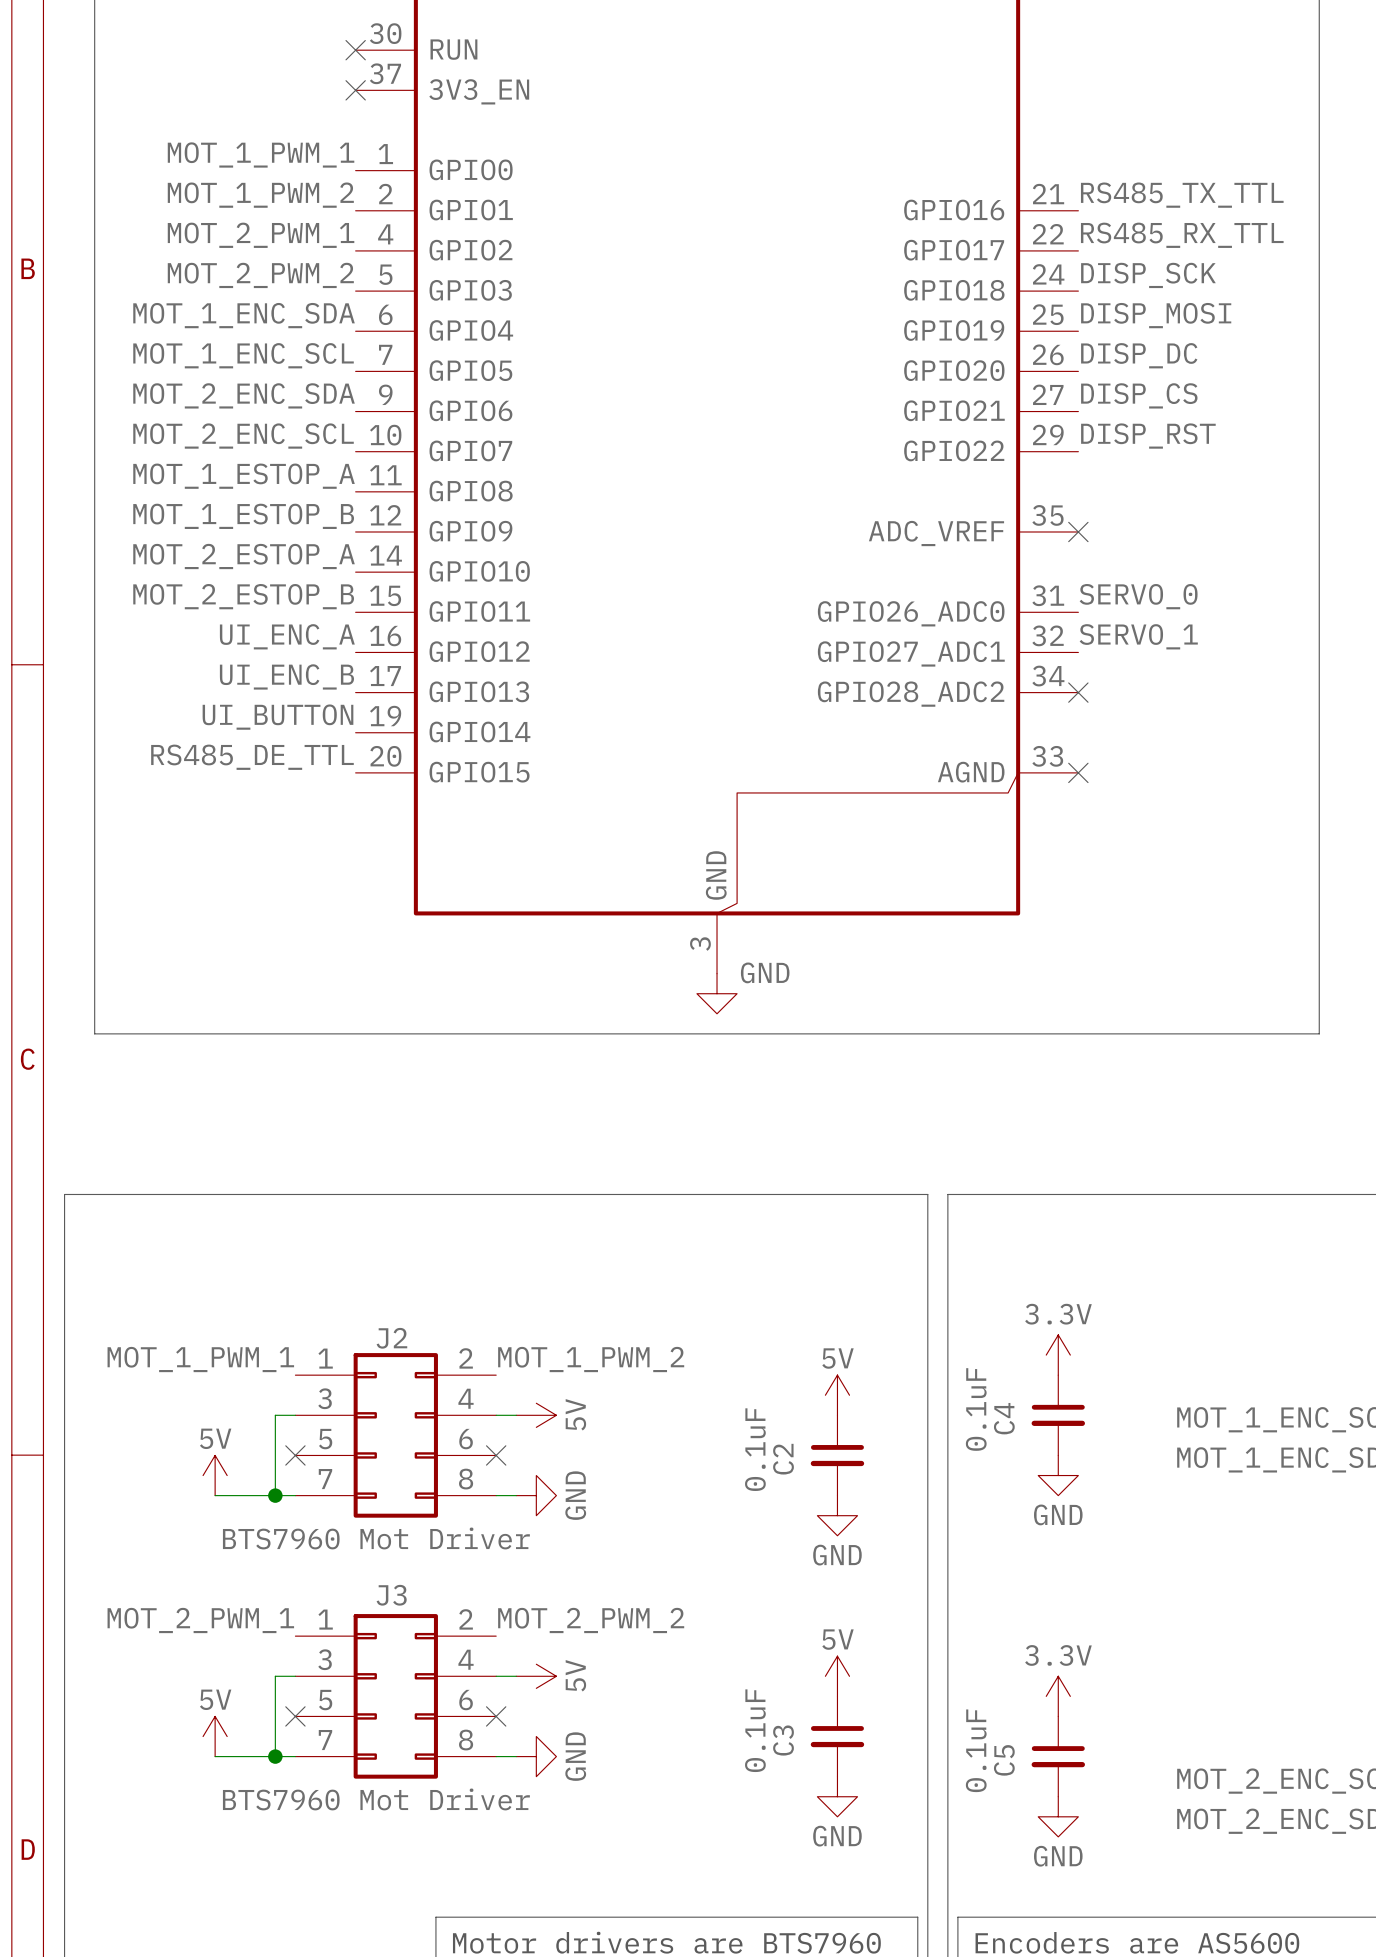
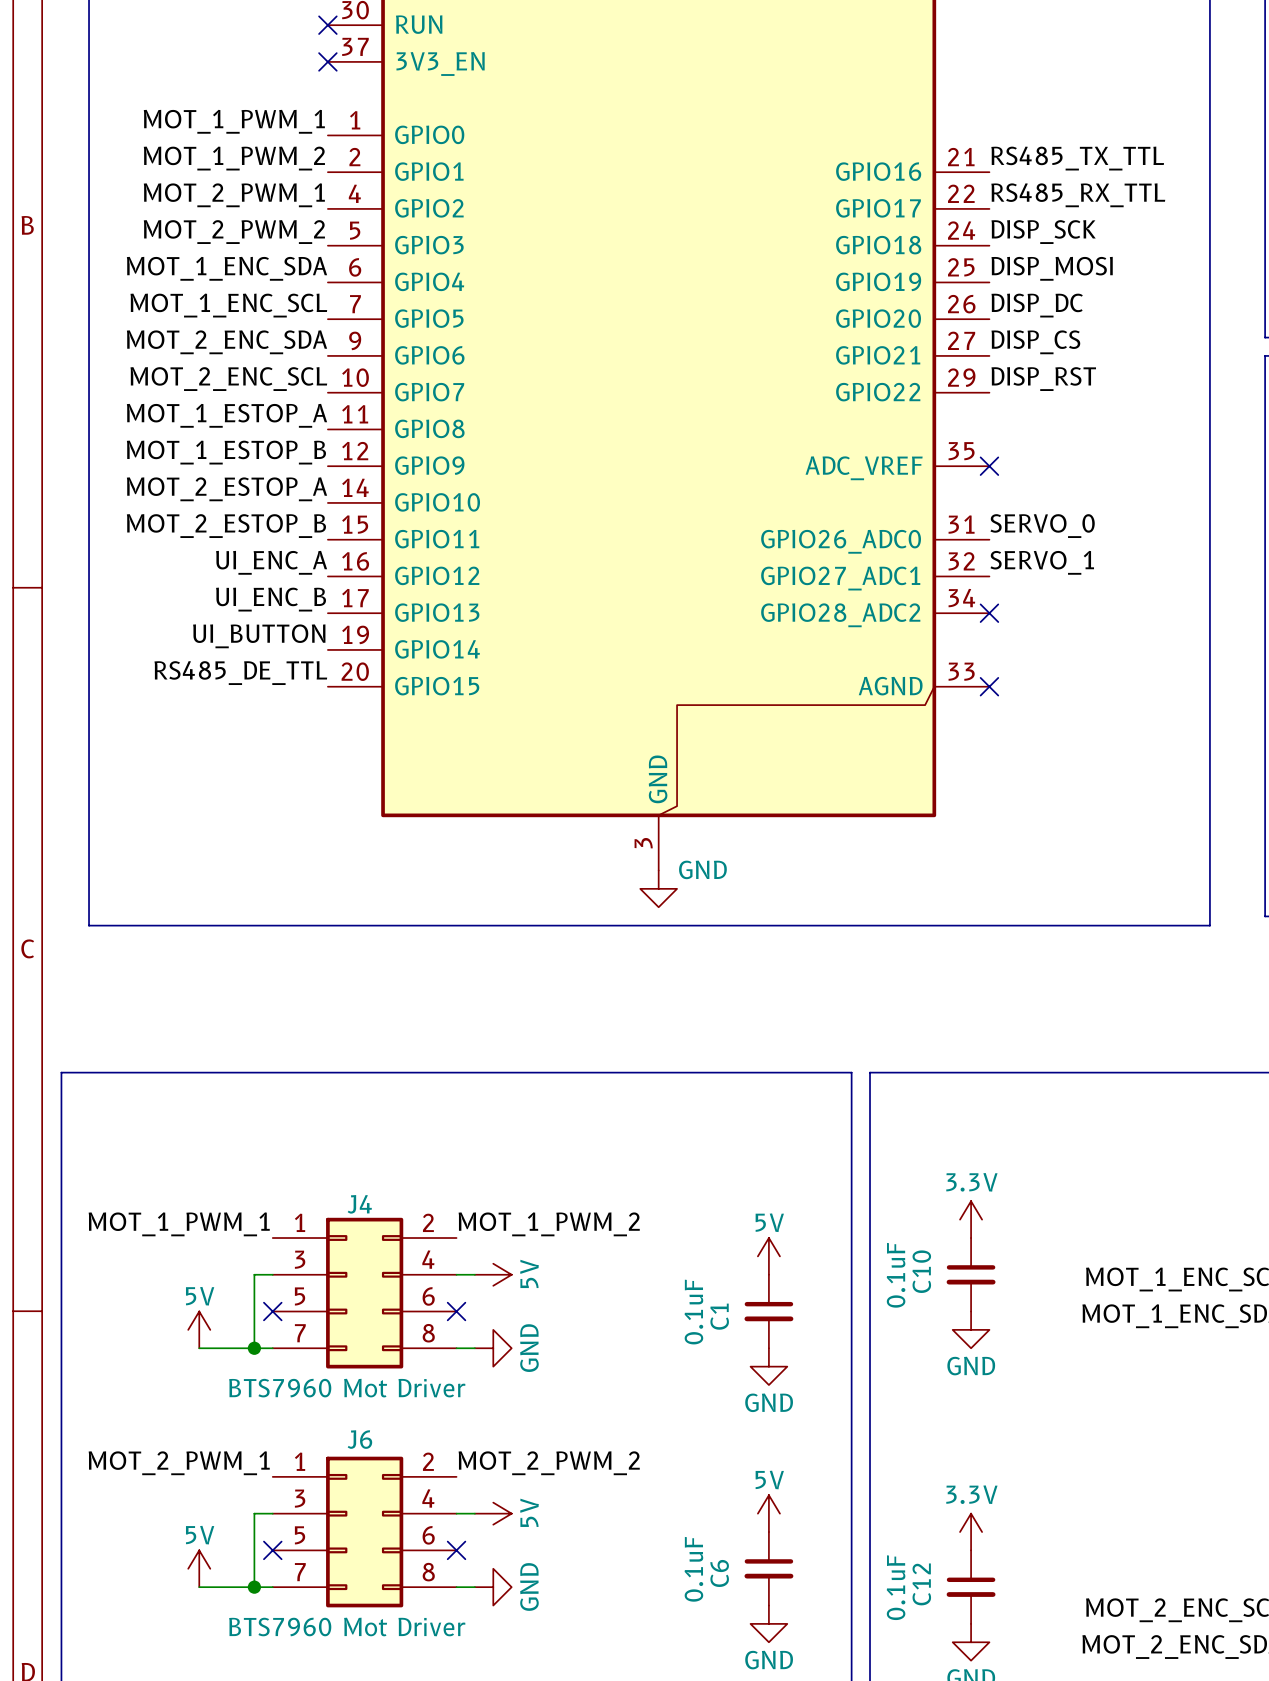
J2 name: J2 (391, 1338) -> J4 (359, 1204)
C4 name: C4 (1004, 1418) -> C10 (921, 1271)
C2 name: C2 (783, 1459) -> C1 (719, 1316)
J3 name: J3 (391, 1595) -> J6 (359, 1439)
C3 name: C3 (783, 1740) -> C6 (719, 1573)
C5 name: C5 (1004, 1760) -> C12 (921, 1584)

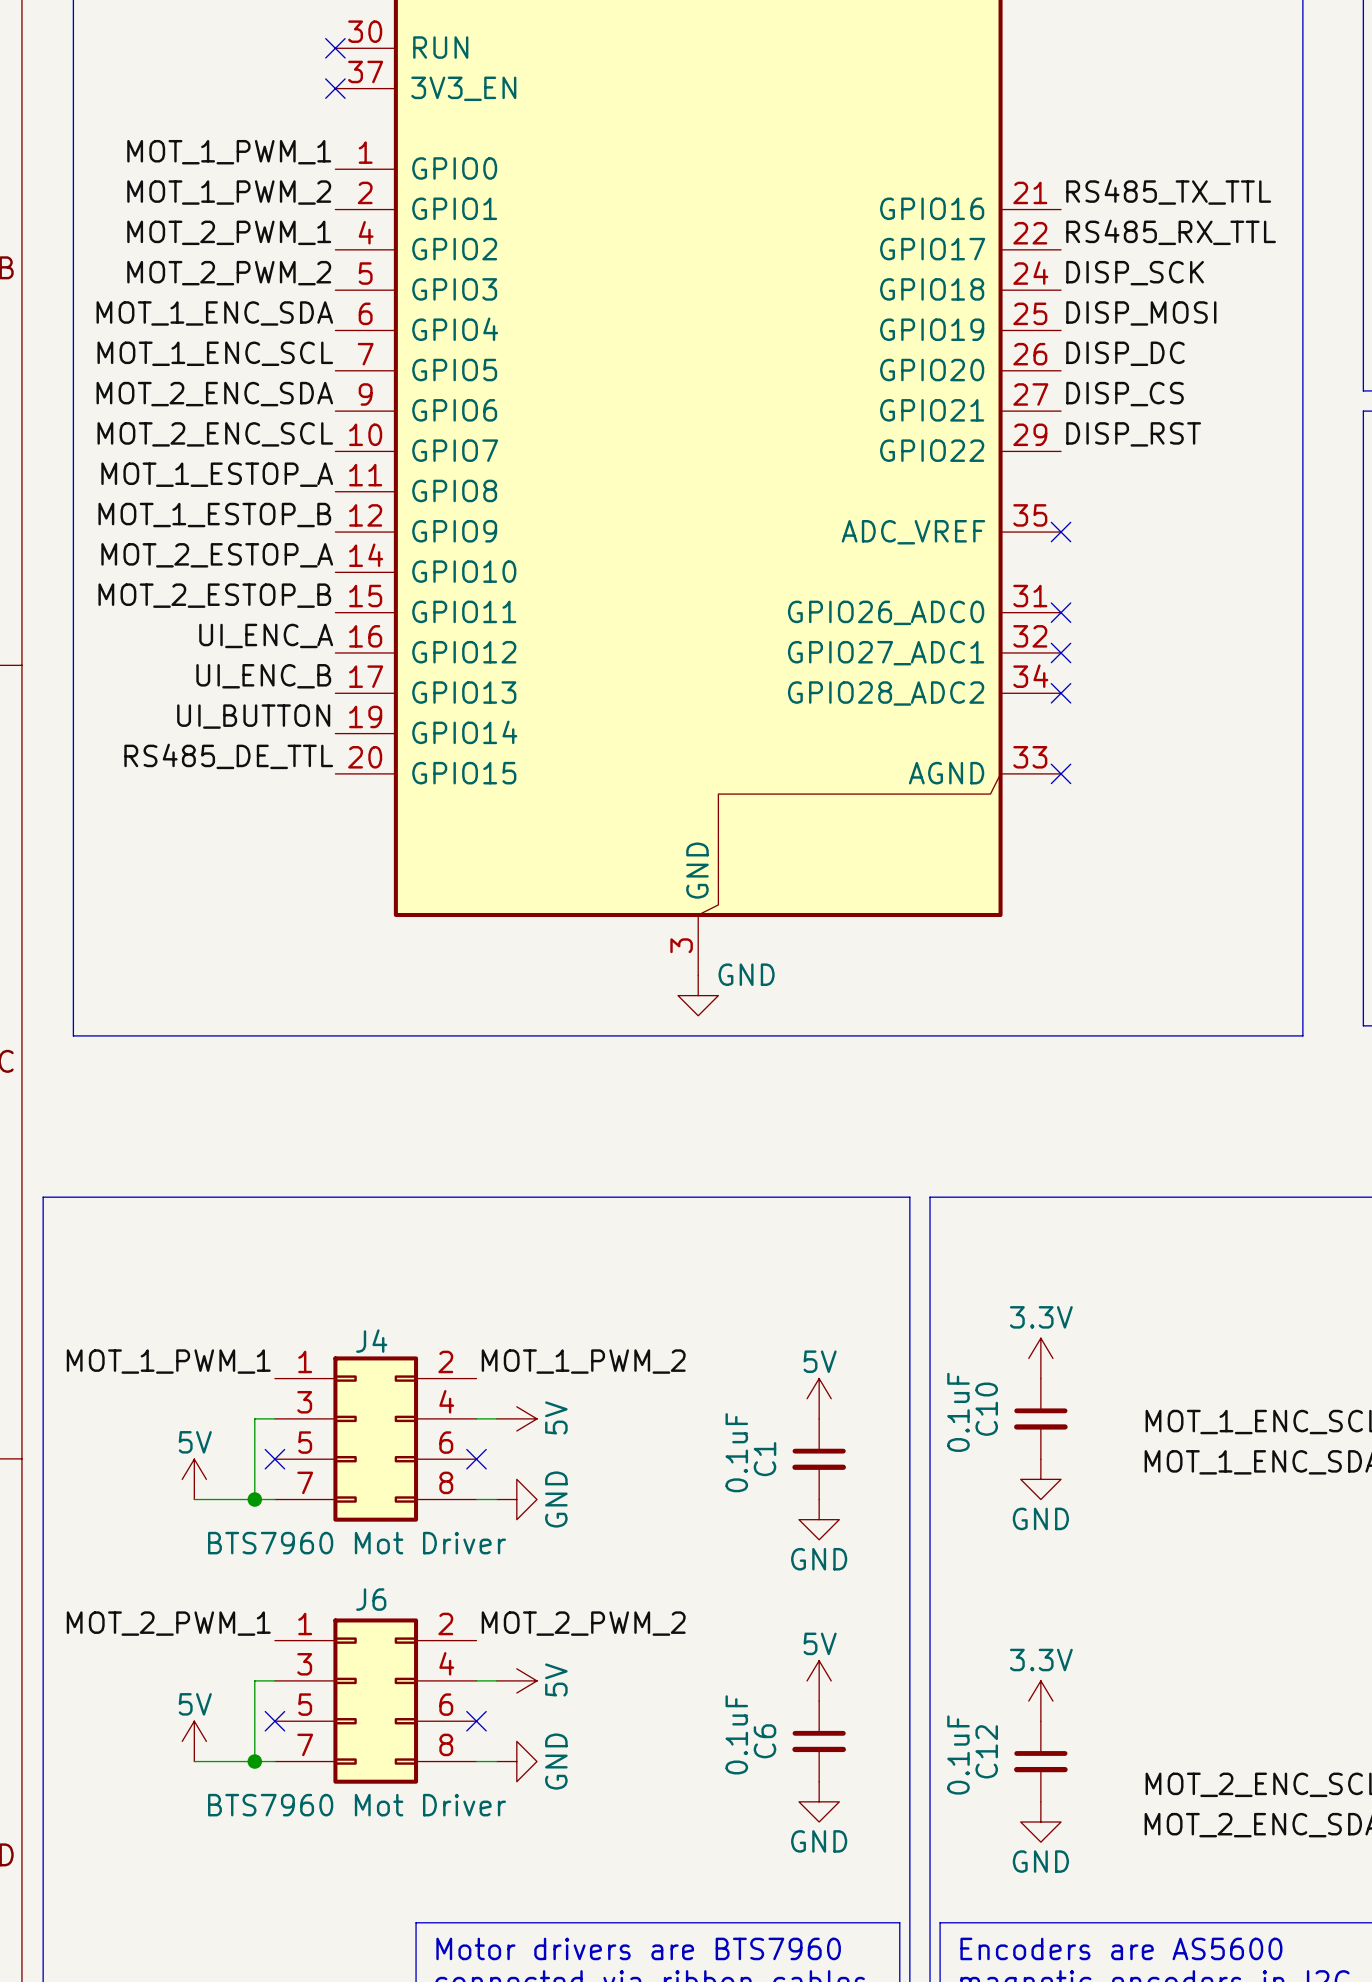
label: SERVO_0 (1042, 526) -> none
no-connect mark: none -> (1061, 612)
label: SERVO_1 (1042, 562) -> none
no-connect mark: none -> (1061, 652)

